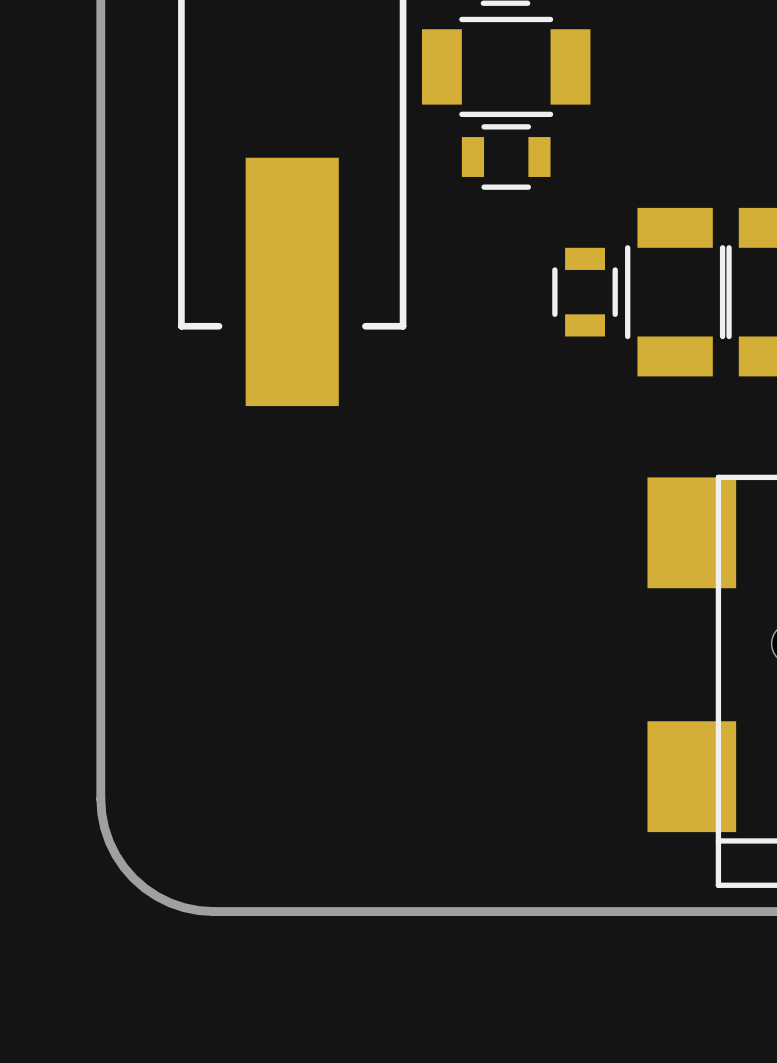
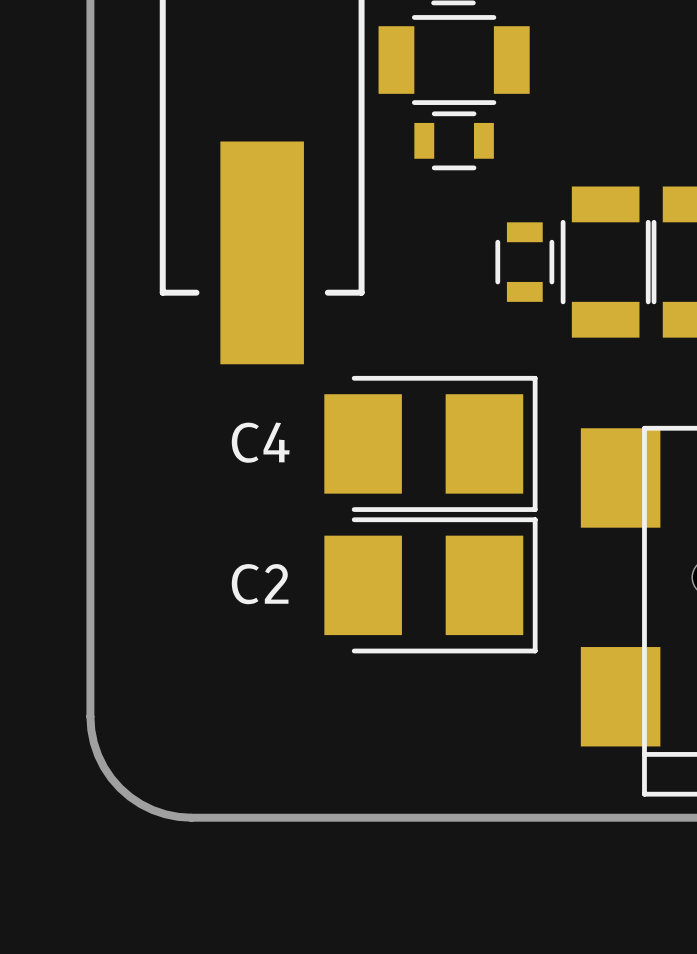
C4: none -> (430, 443)
C2: none -> (430, 585)

